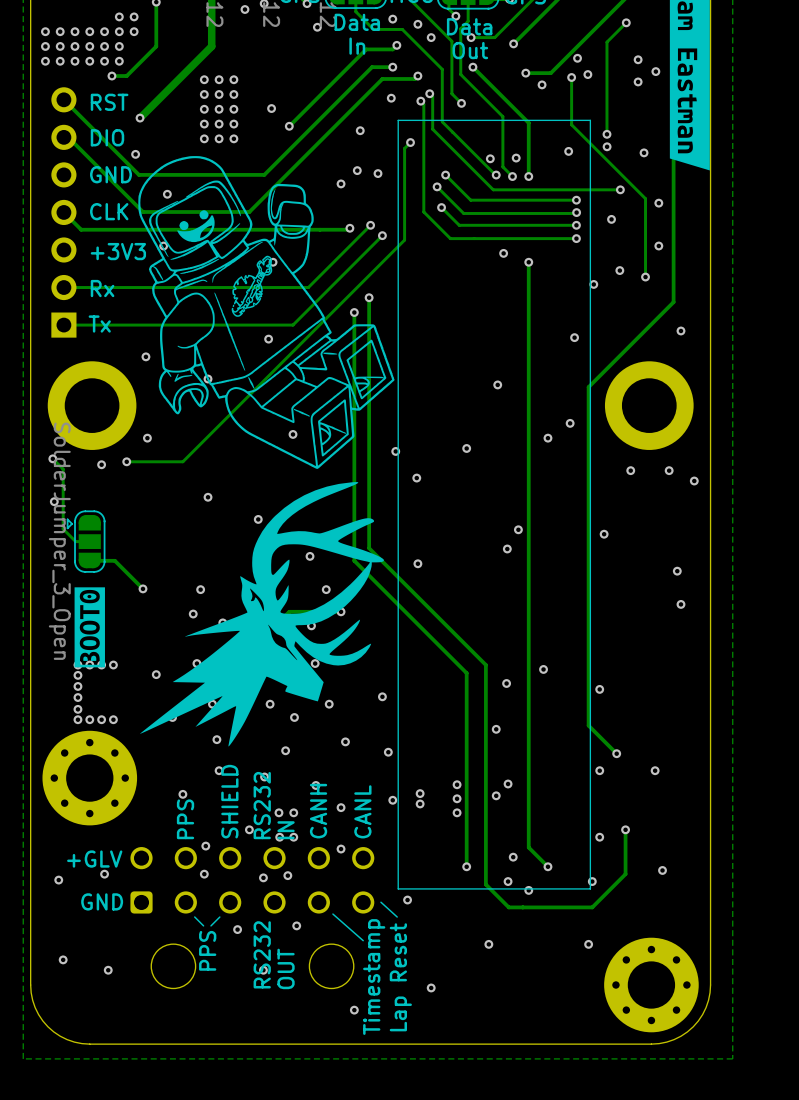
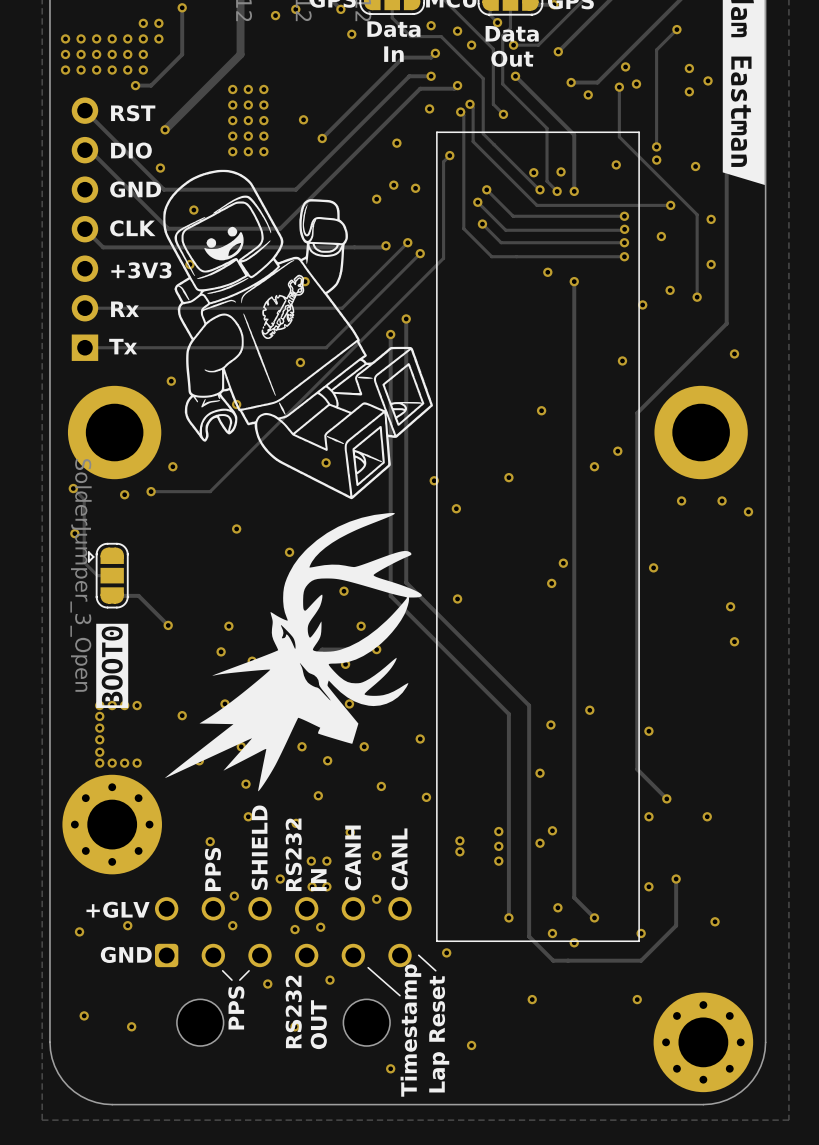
via: (392, 800) -> none

